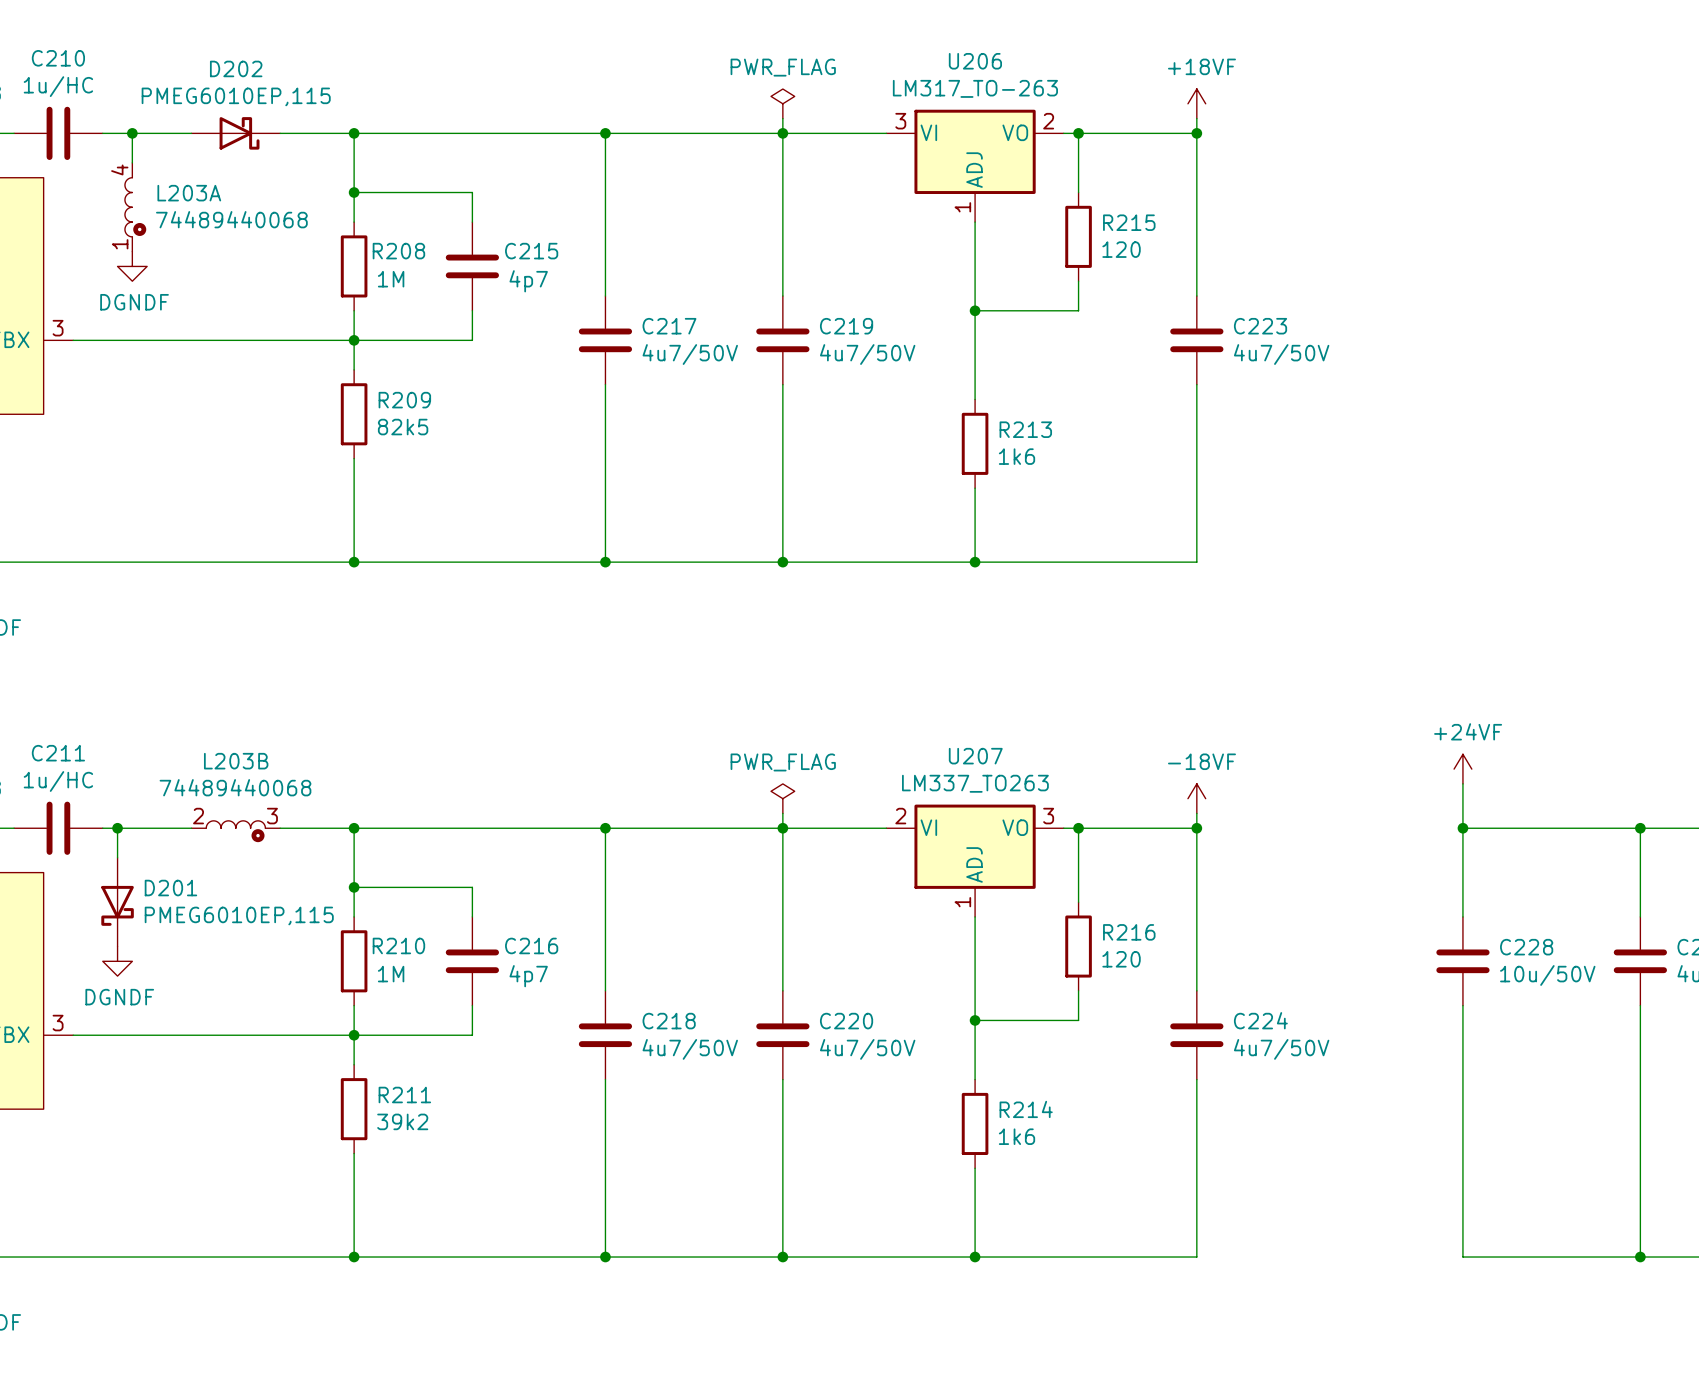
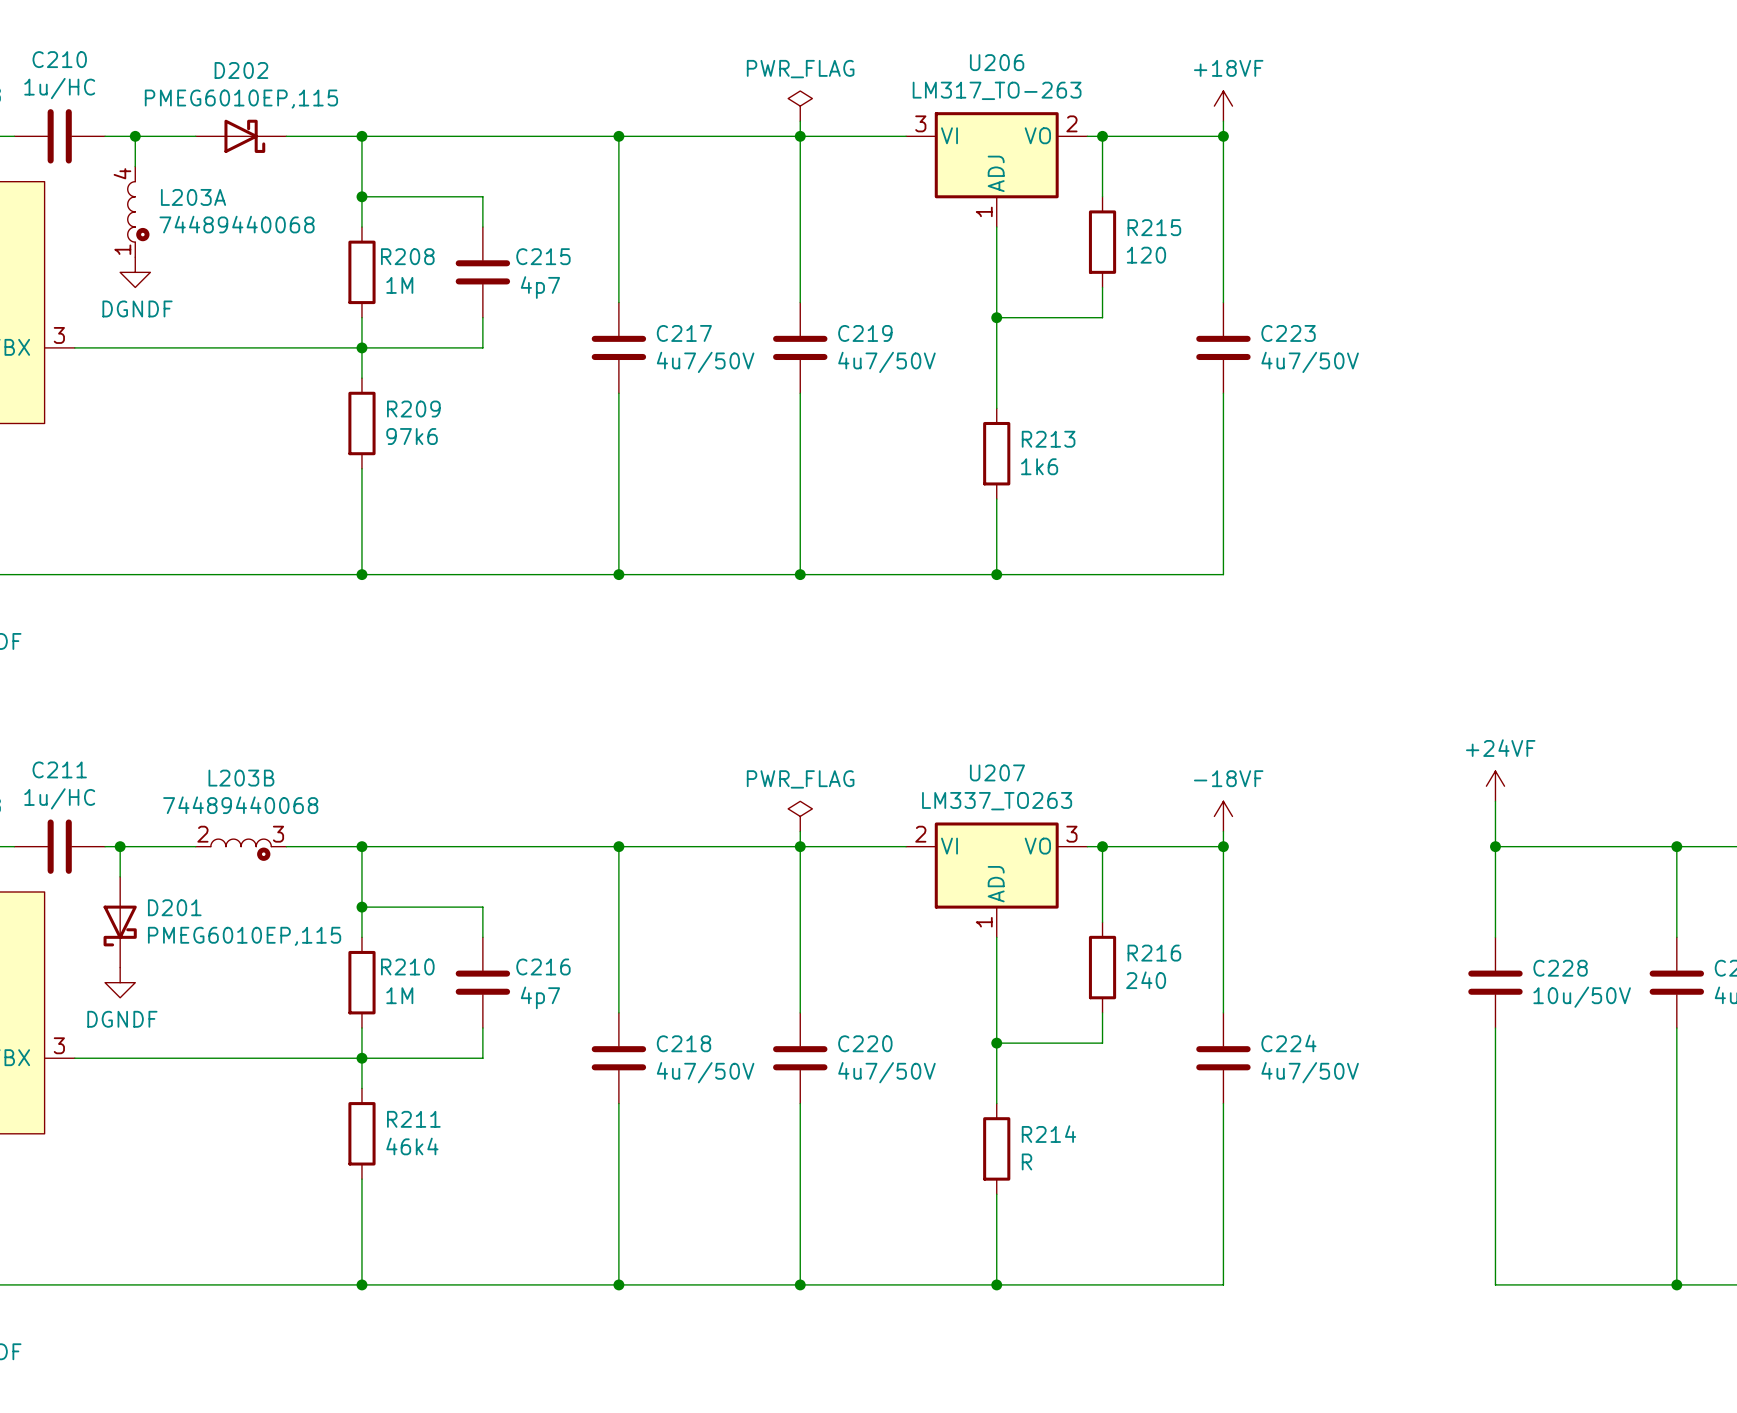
R209 value: 82k5 (403, 427) -> 97k6 (412, 436)
R216 value: 120 (1121, 959) -> 240 (1146, 980)
R211 value: 39k2 (402, 1121) -> 46k4 (412, 1146)
R214 value: 1k6 (1016, 1136) -> R (1027, 1161)

